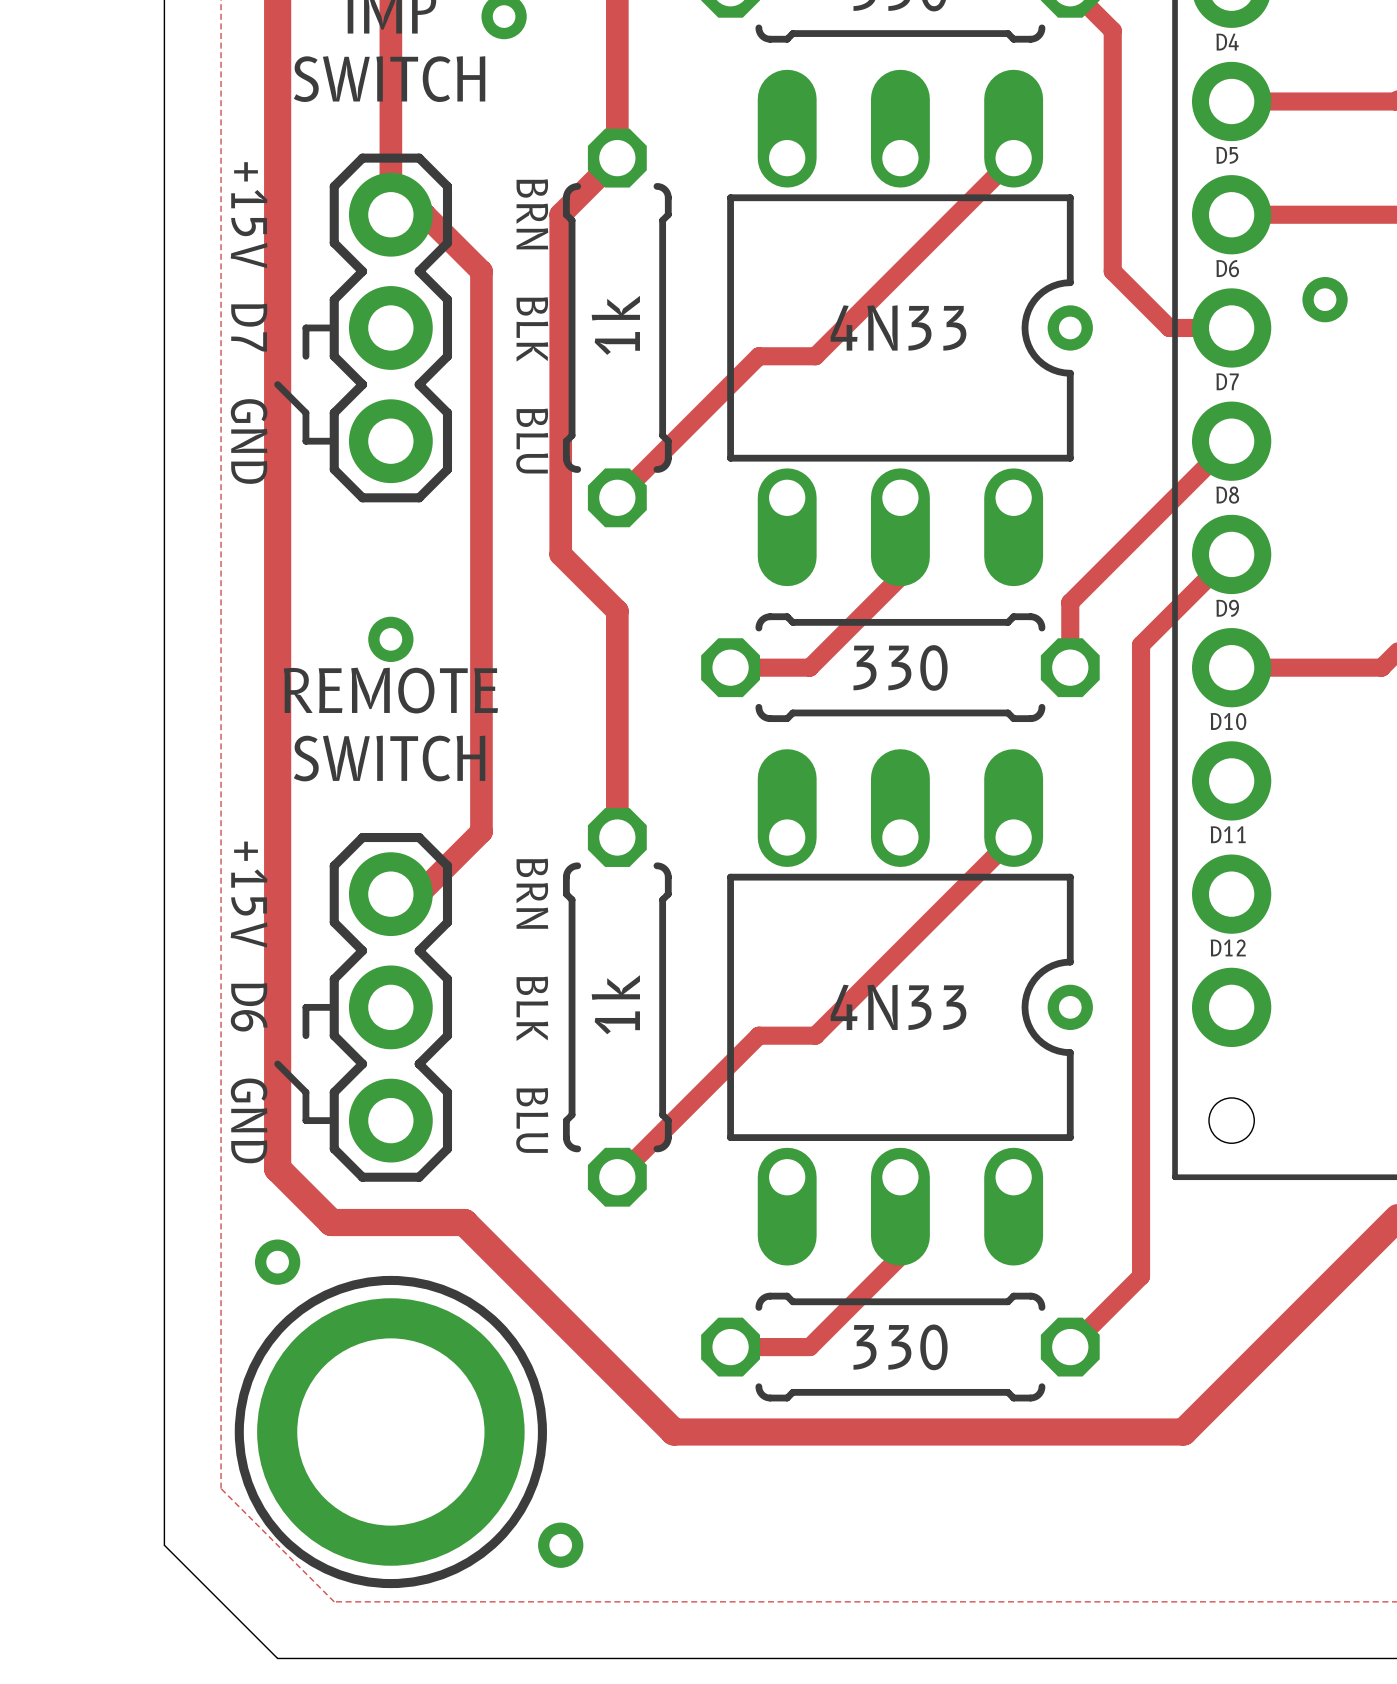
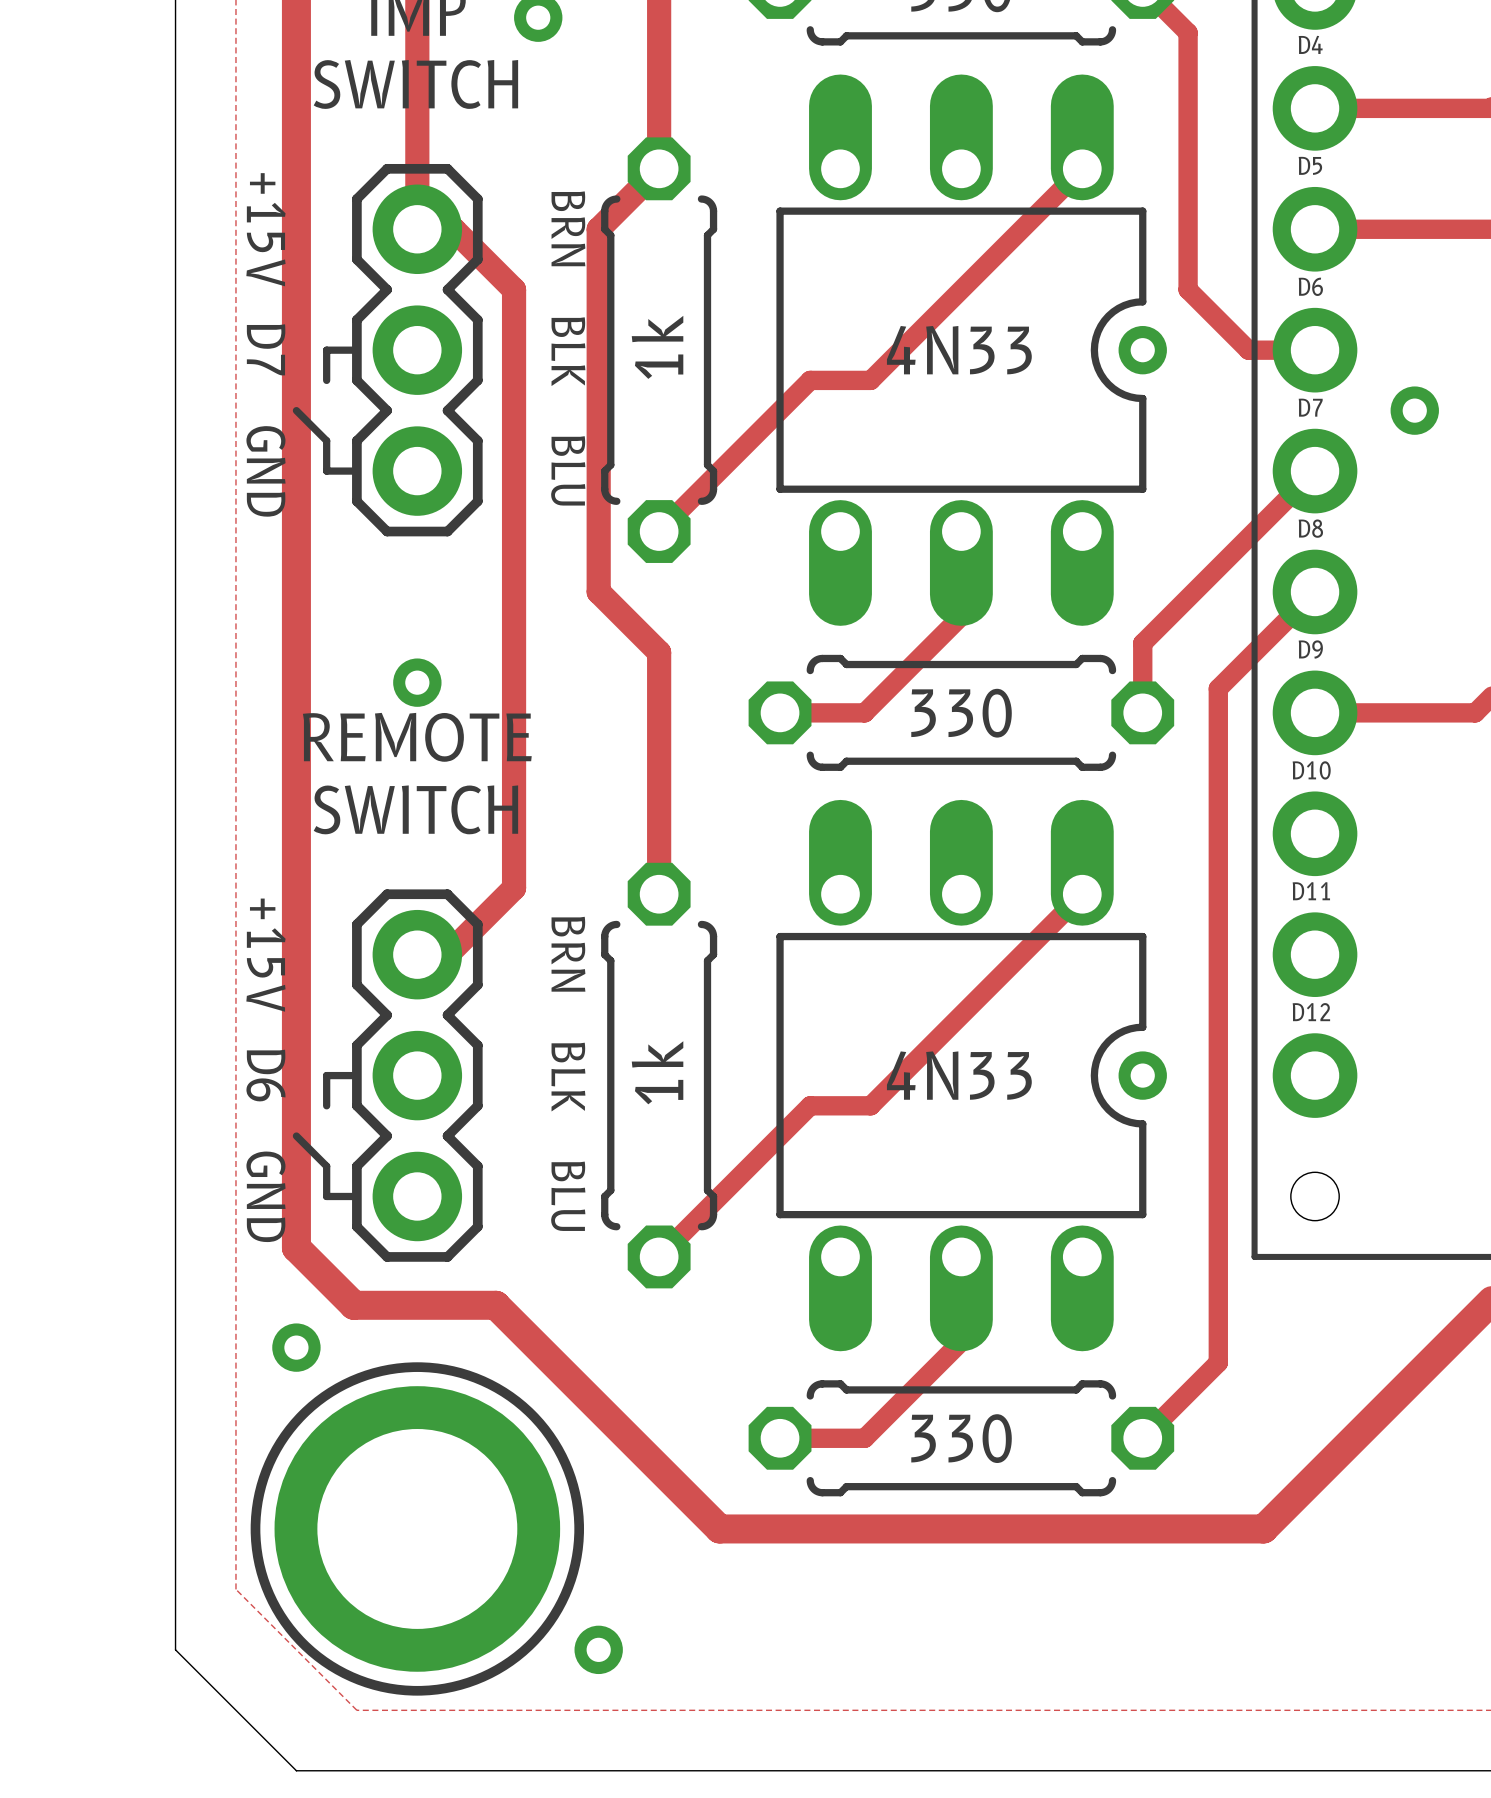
via position: (1325, 299) -> (1414, 410)

